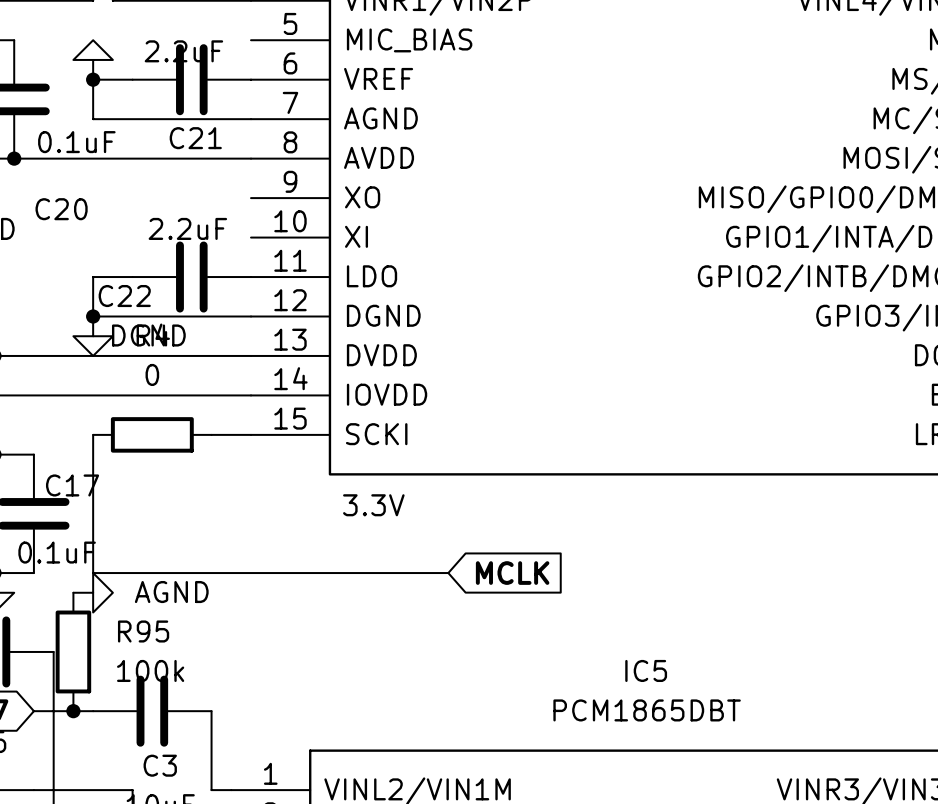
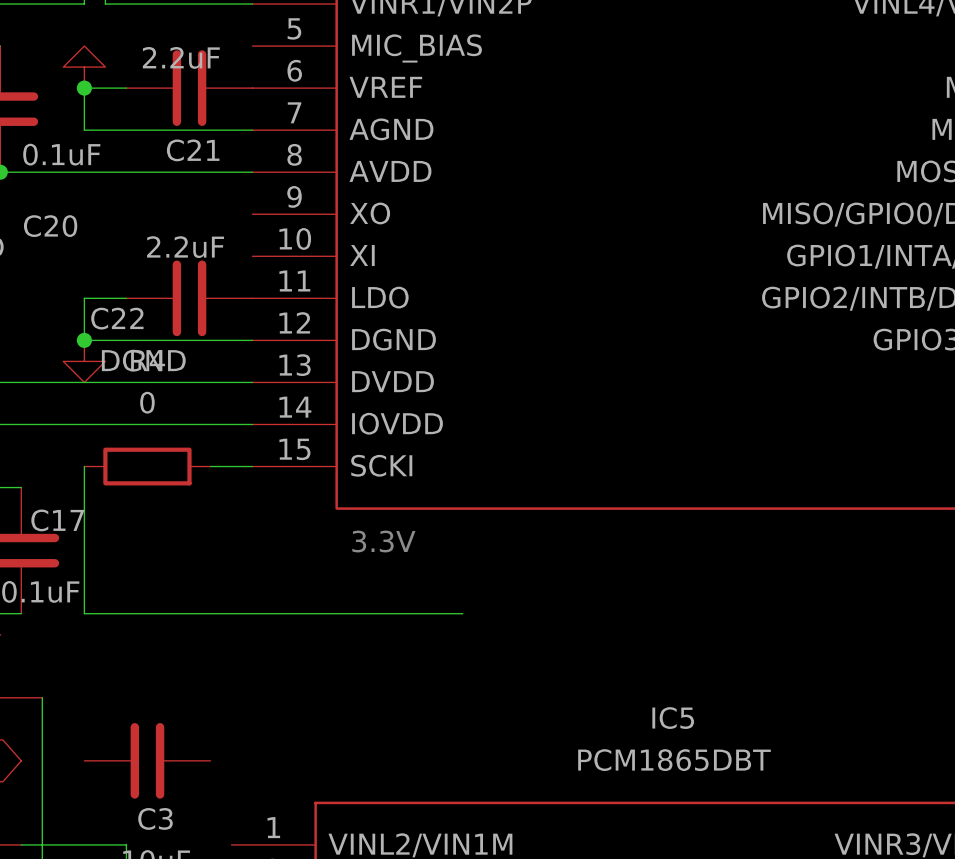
global label: MCLK (512, 573) -> none
power symbol: AGND (93, 592) -> none
R95: 100k (73, 651) -> none
wire: (33, 711) (93, 711) -> none
junction: (73, 711) -> none
wire: (211, 711) (211, 790) (231, 790) -> none

